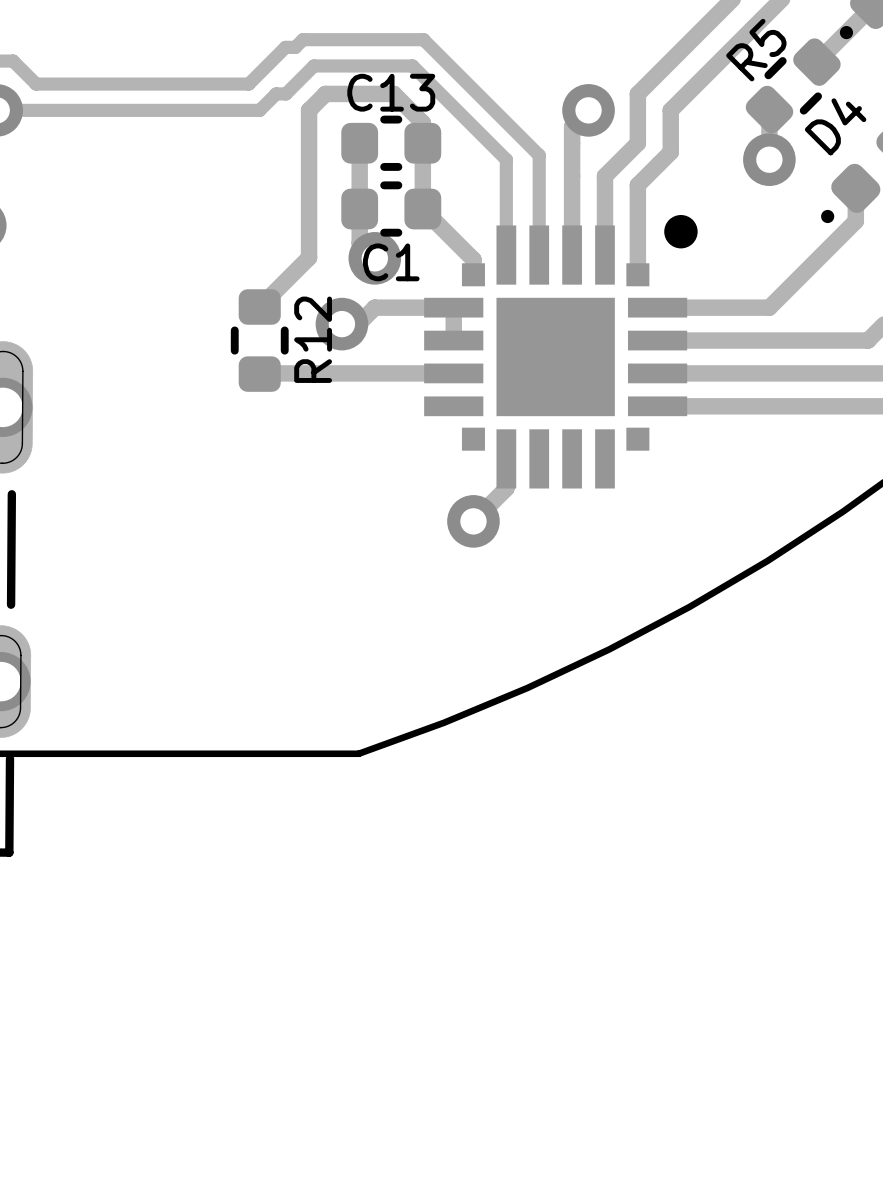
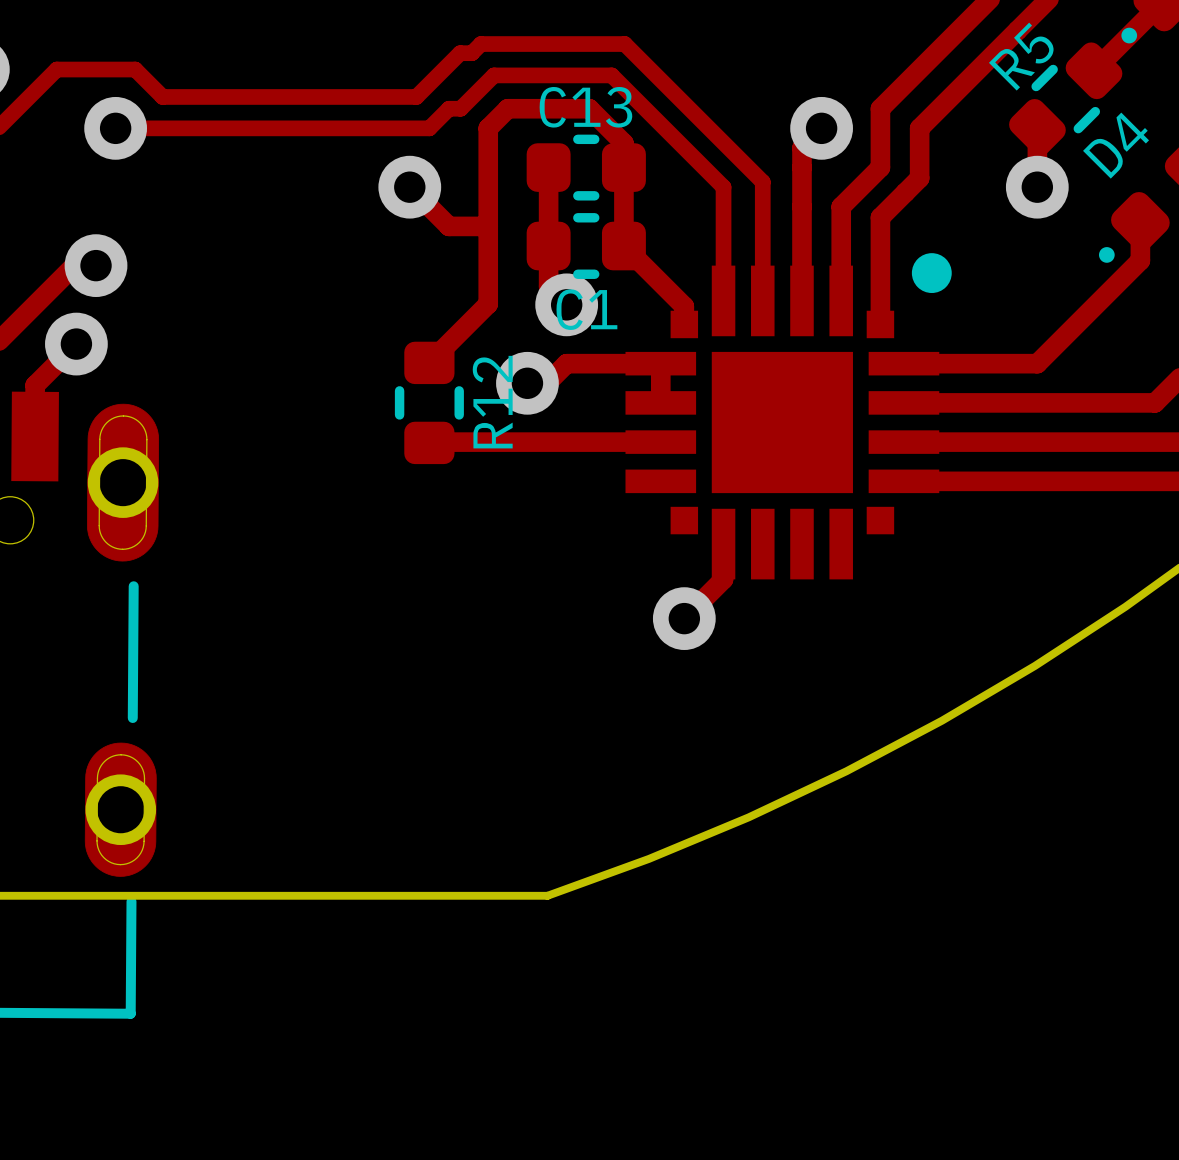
track: none -> (409, 187) (449, 226) (488, 226)
via: none -> (409, 187)

